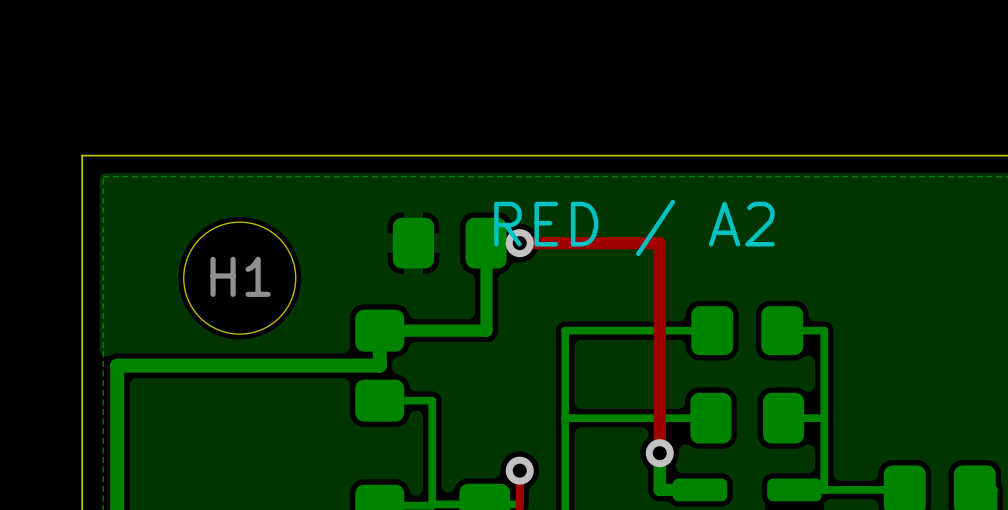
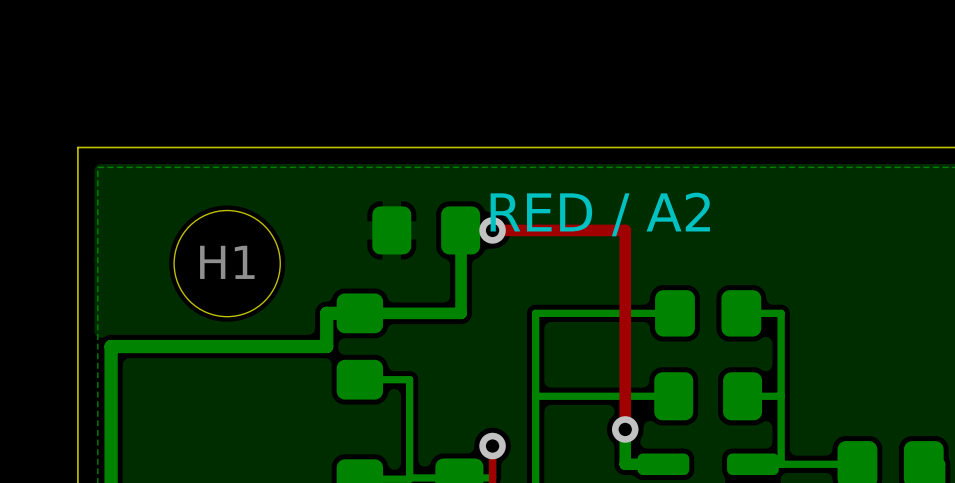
bottom track: (379, 330) (379, 365) (344, 365) -> (359, 313) (326, 313) (326, 346)

